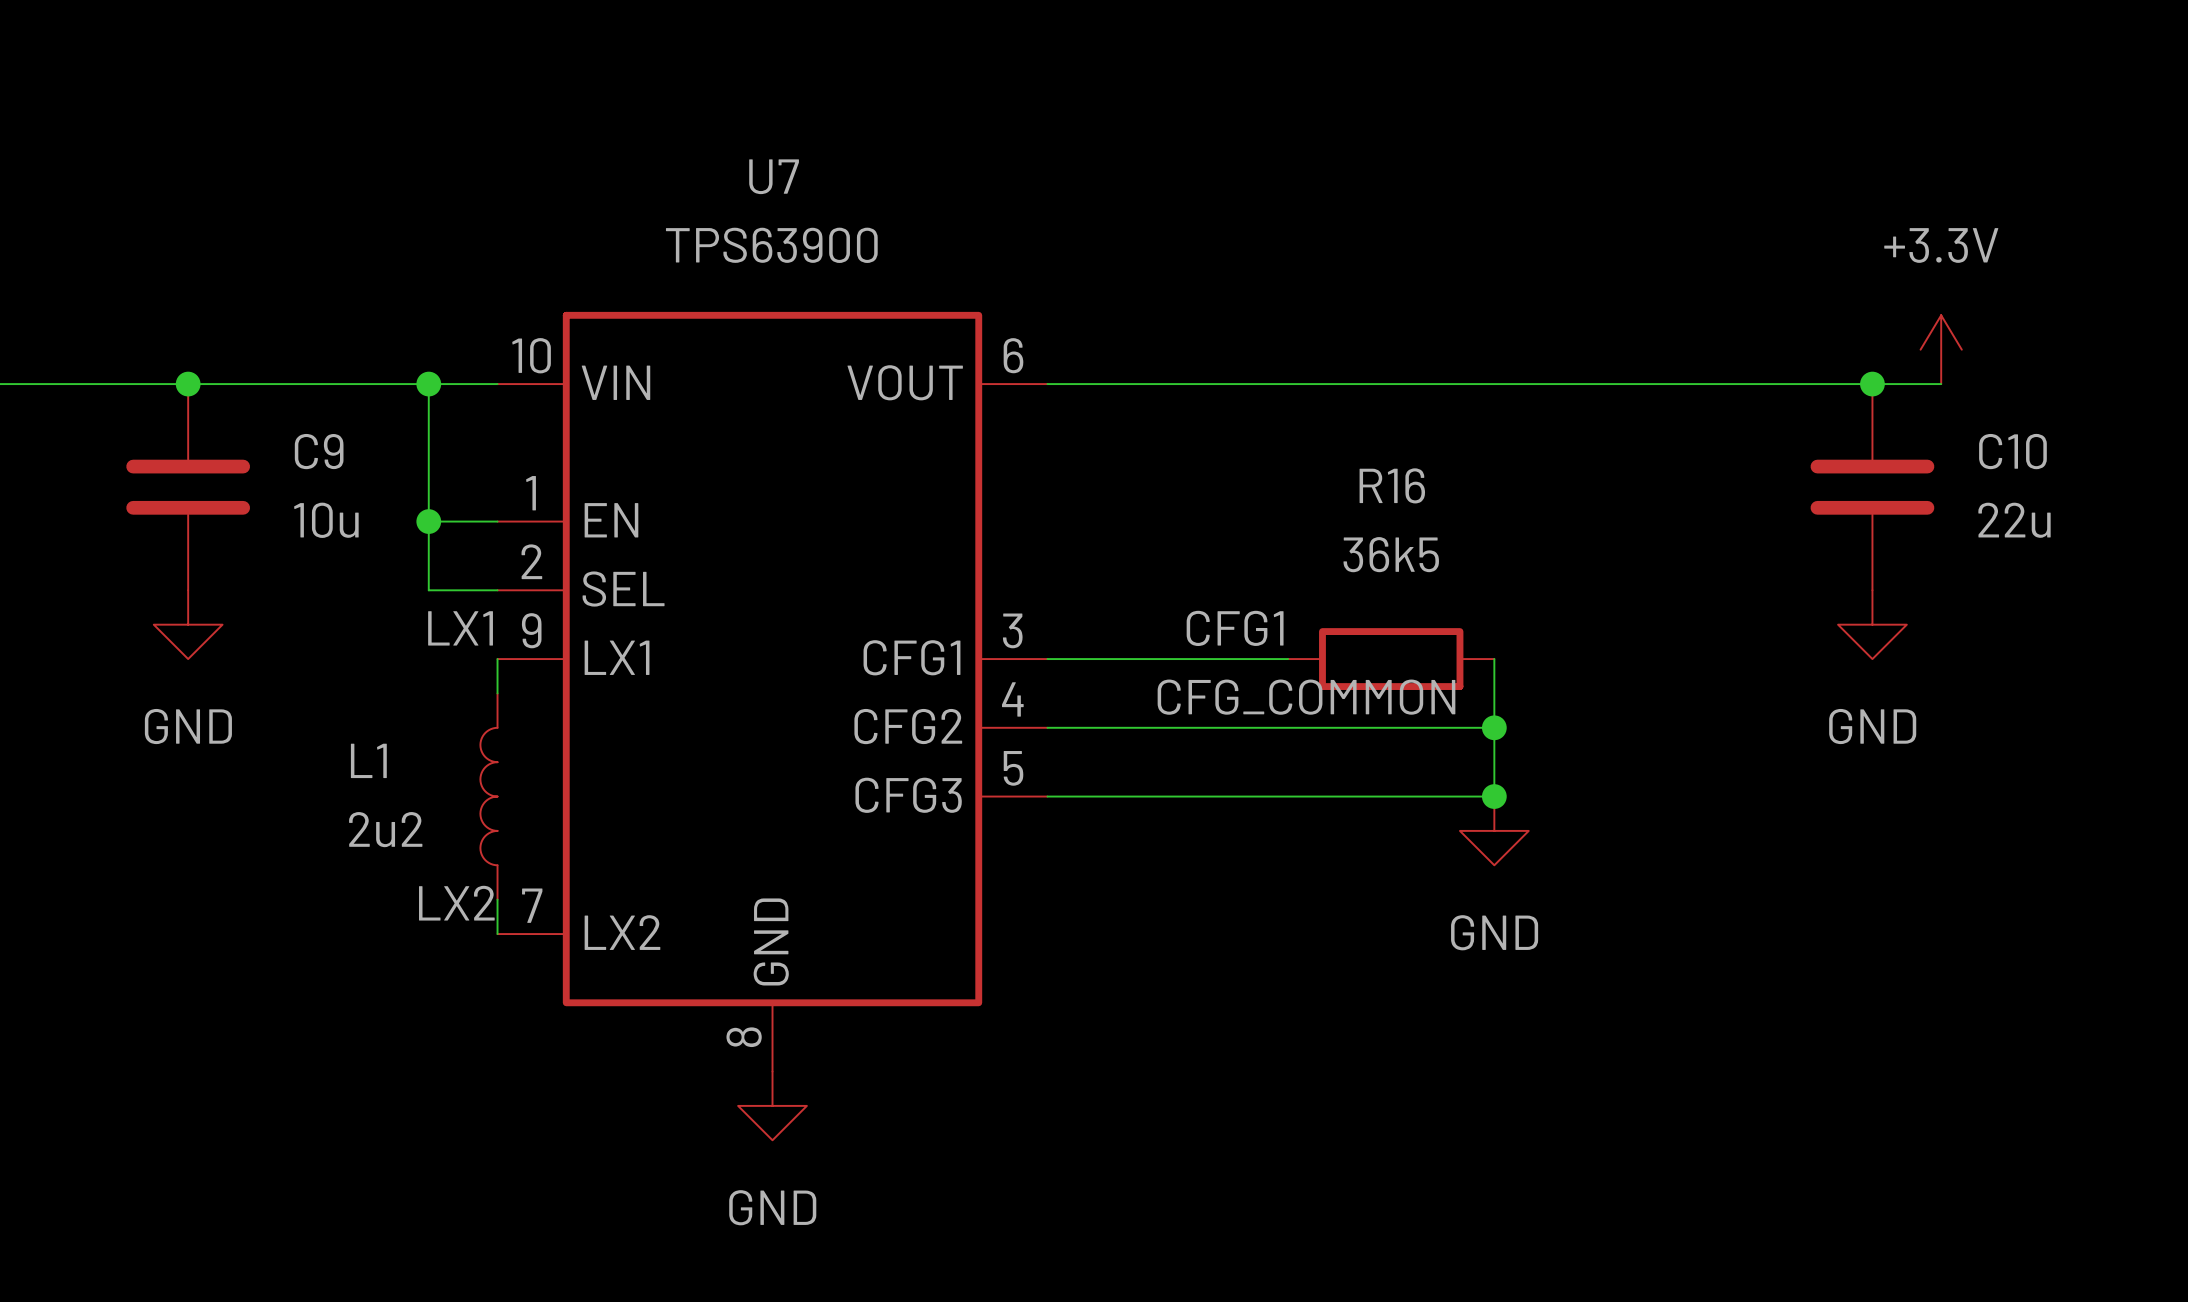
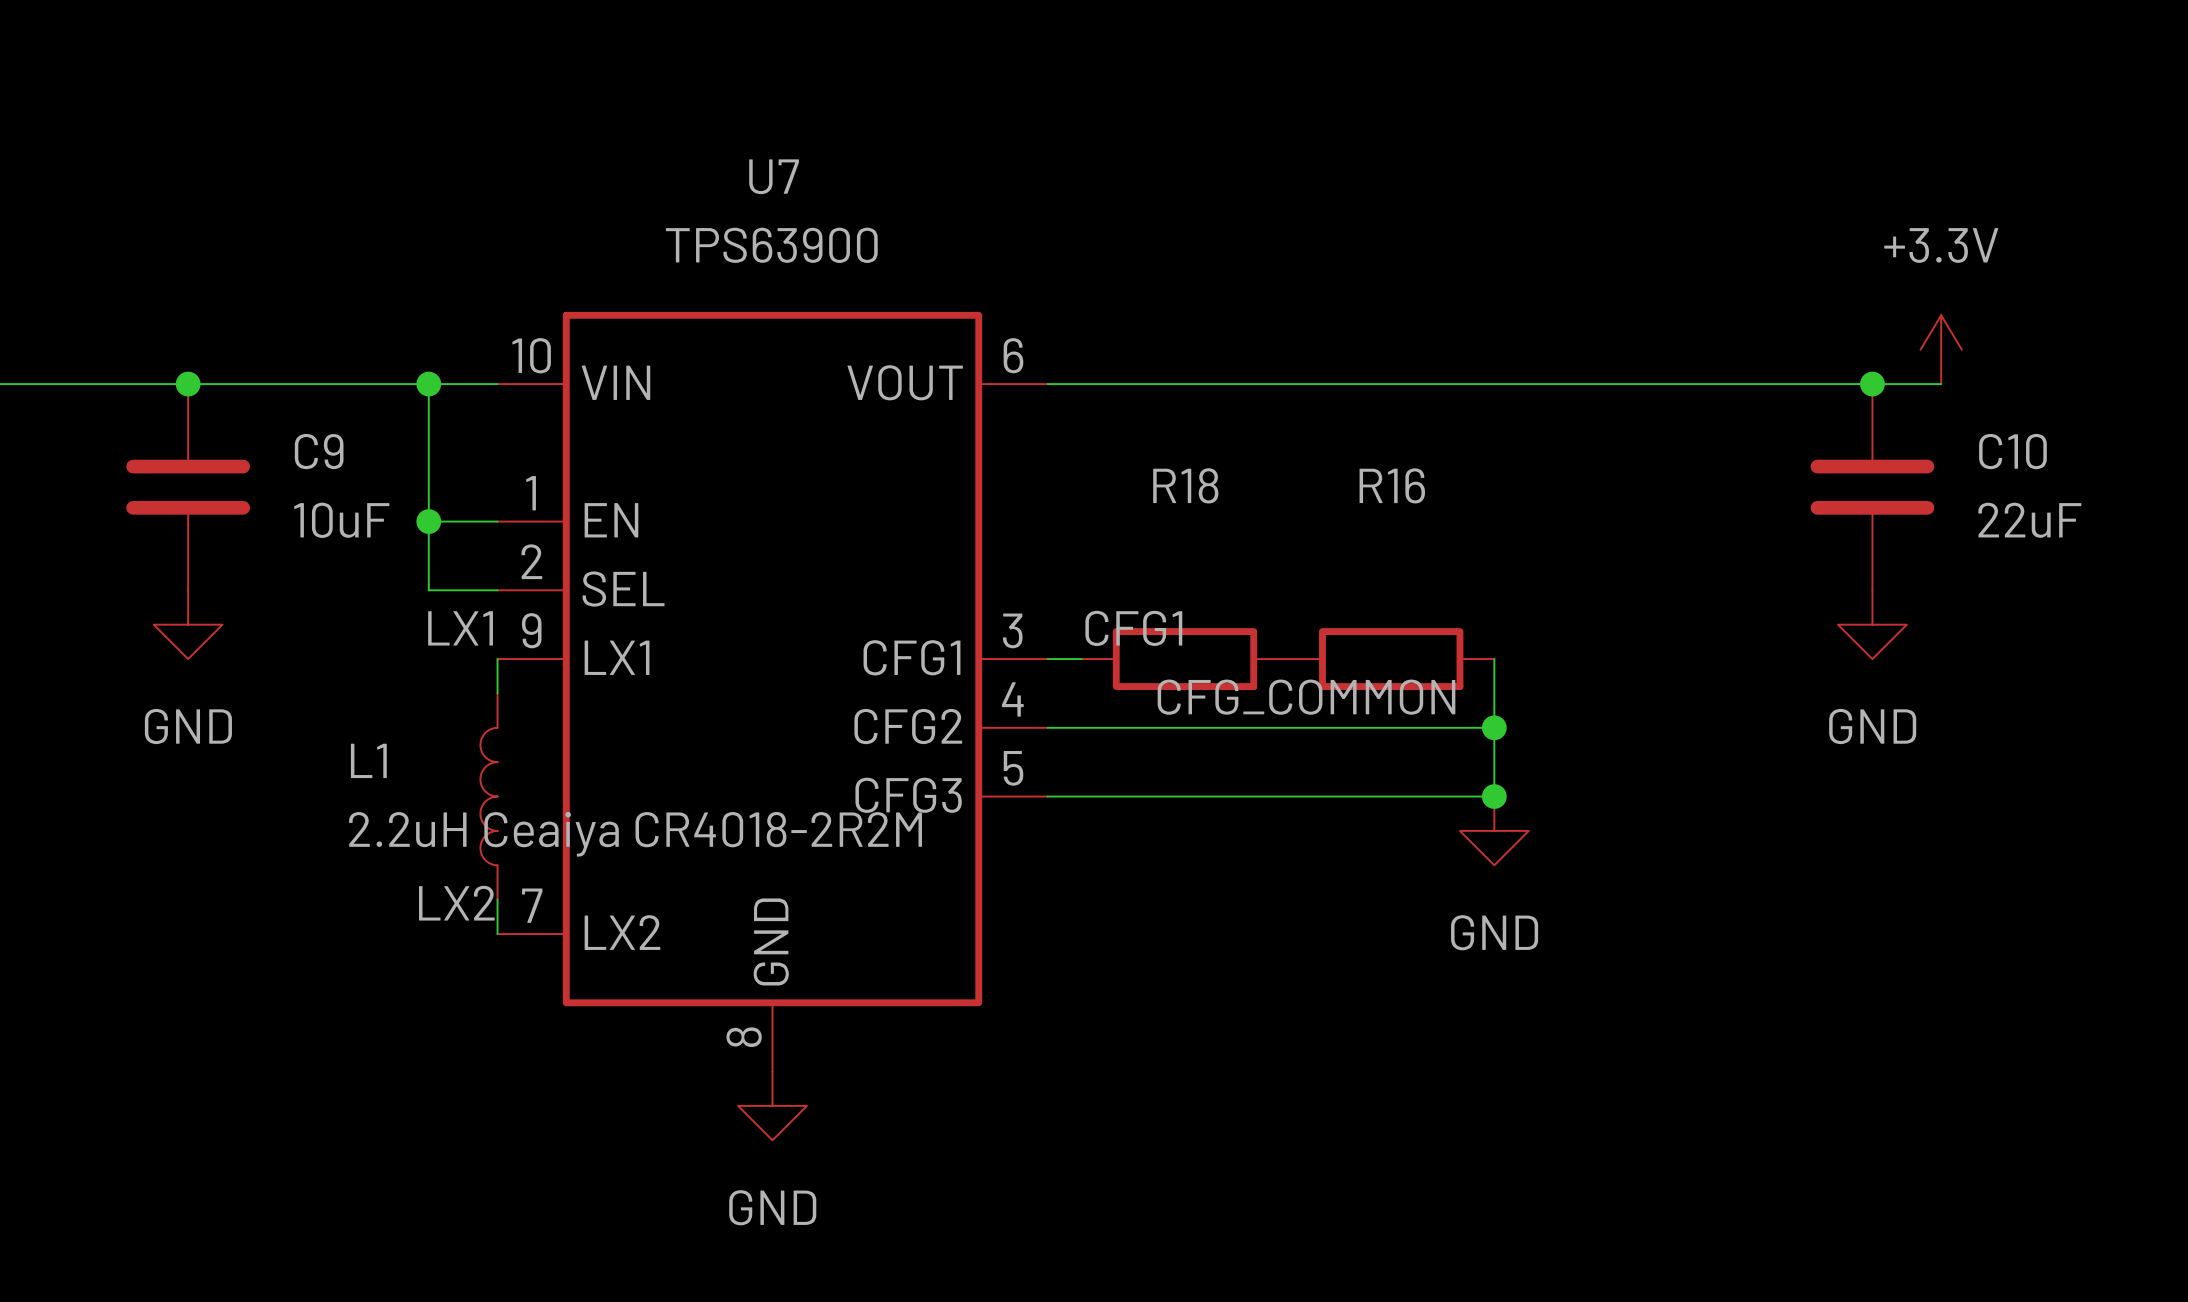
C9 value: 10u (326, 520) -> 10uF (341, 520)
C10 value: 22u (2014, 520) -> 22uF (2029, 520)
R16 value: 36k5 (1391, 554) -> none
label position: CFG1 (1235, 628) -> CFG1 (1133, 628)
wire: (1081, 659) (1288, 659) -> none
R18: none -> (1184, 659)
L1 value: 2u2 (385, 829) -> 2.2uH Ceaiya CR4018-2R2M (635, 834)

